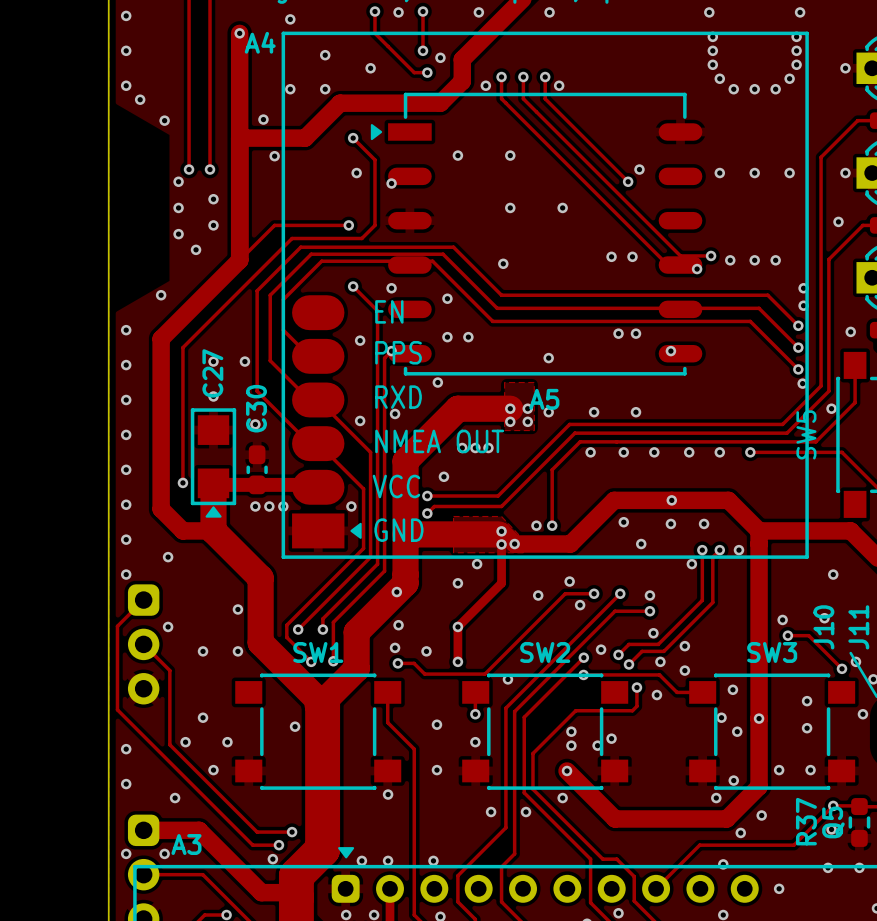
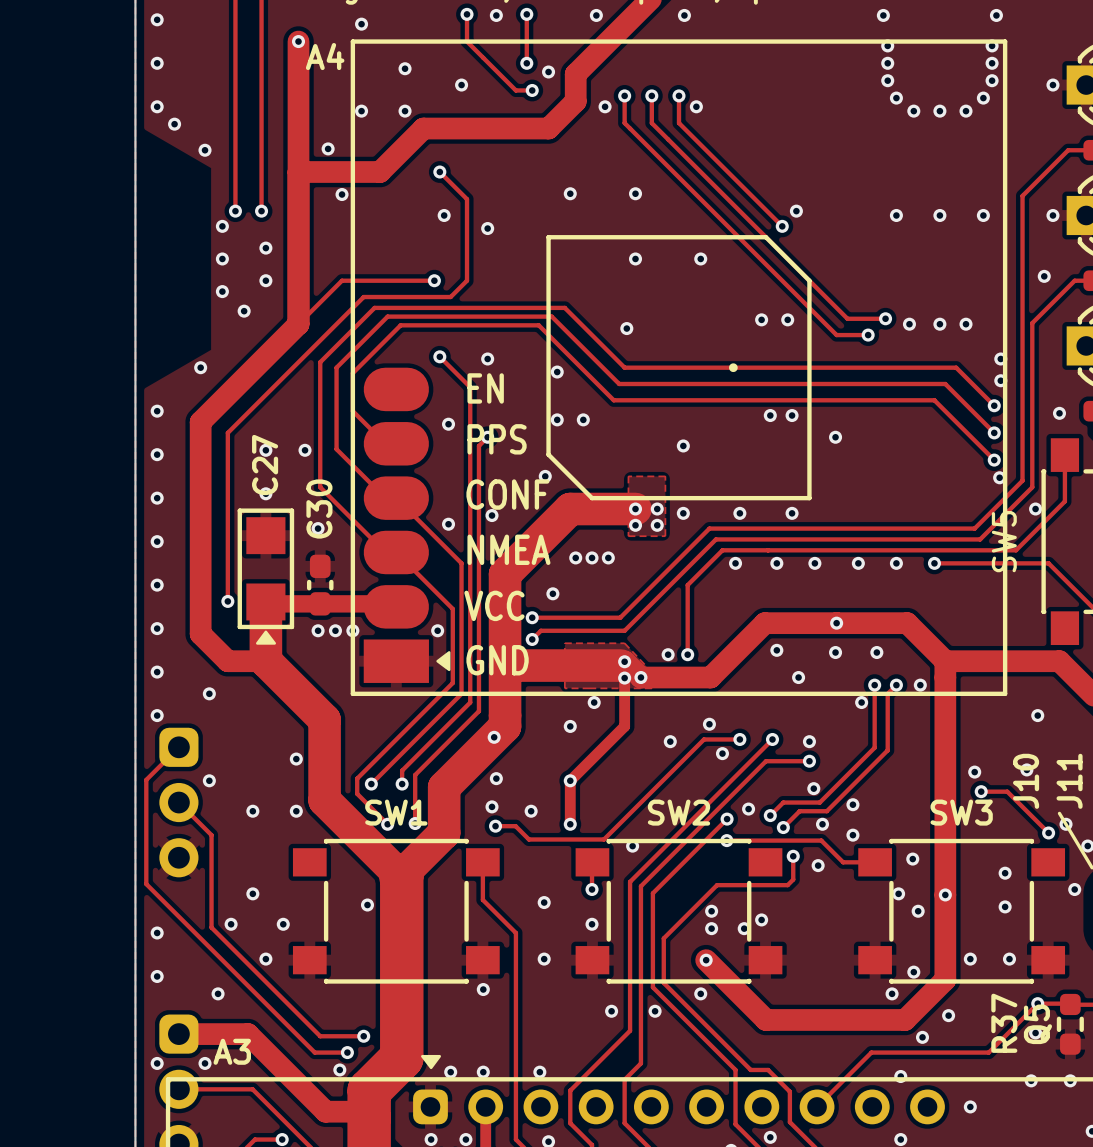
A4 footprint: [281, 31, 809, 559] -> [350, 39, 1008, 697]
A5: (536, 234) -> none

